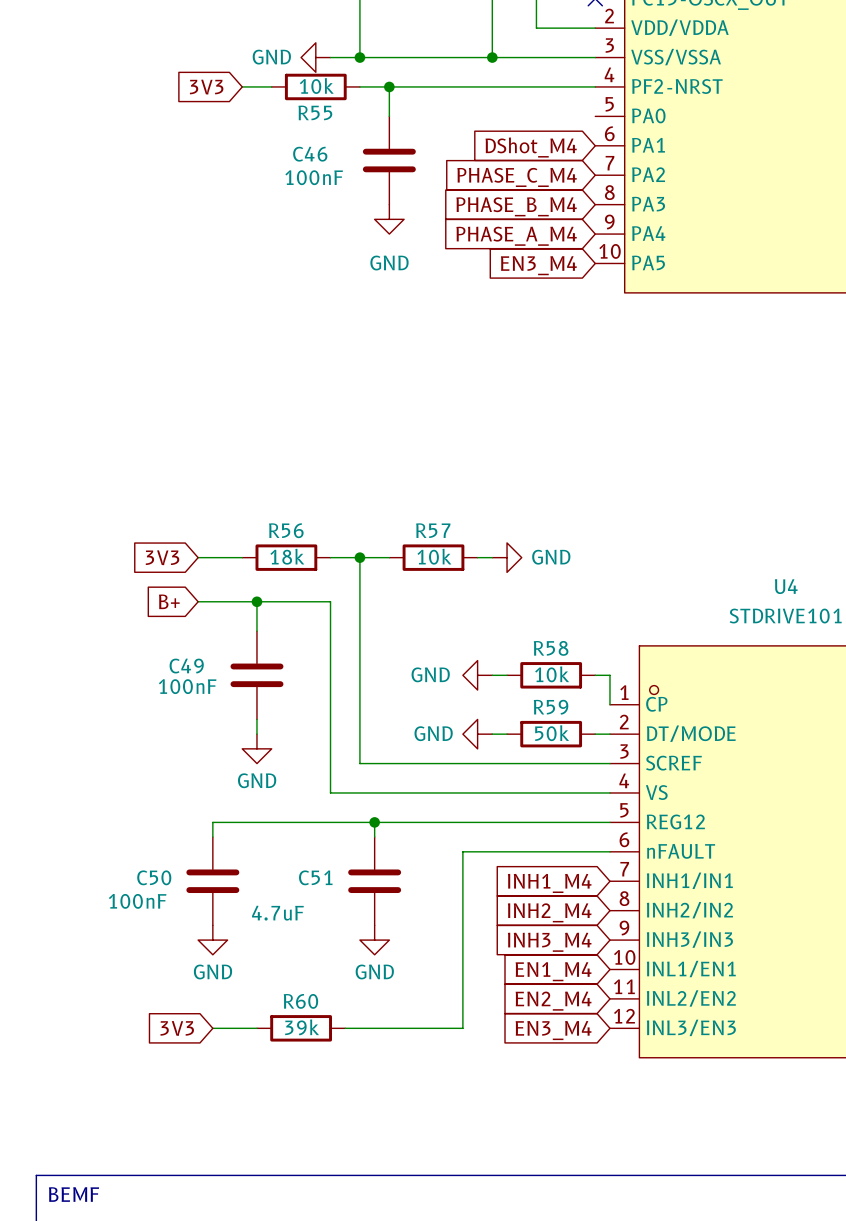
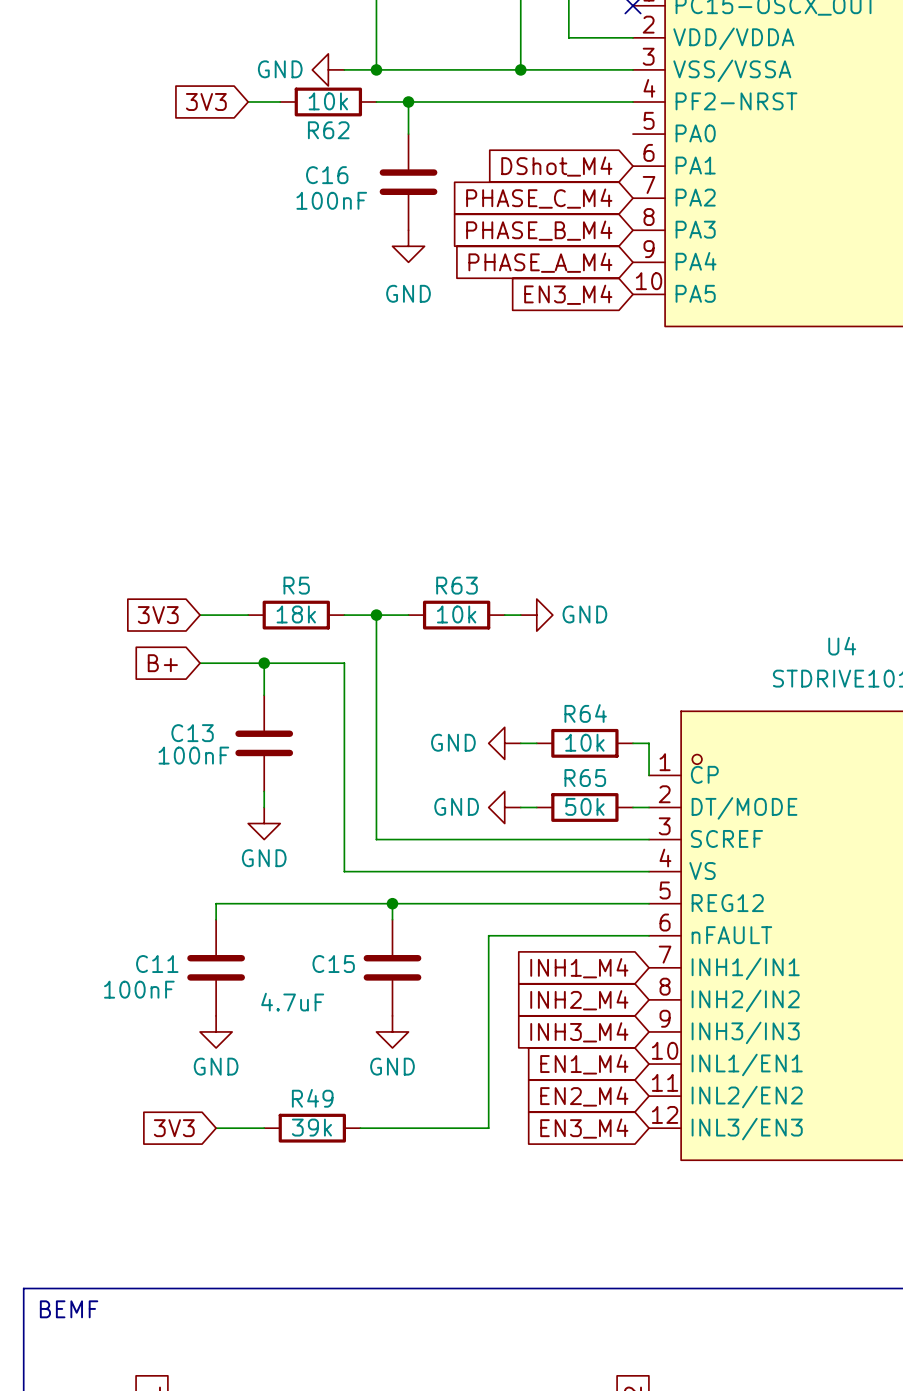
R55 name: R55 (315, 112) -> R62 (328, 130)
C46 name: C46 (310, 154) -> C16 (327, 175)
R56 name: R56 (286, 530) -> R5 (296, 585)
R57 name: R57 (433, 530) -> R63 (457, 585)
R58 name: R58 (551, 648) -> R64 (585, 713)
C49 name: C49 (186, 666) -> C13 (192, 733)
R59 name: R59 (551, 707) -> R65 (585, 778)
C50 name: C50 (154, 877) -> C11 (157, 964)
C51 name: C51 (315, 877) -> C15 (333, 964)
R60 name: R60 (300, 1001) -> R49 (312, 1098)

